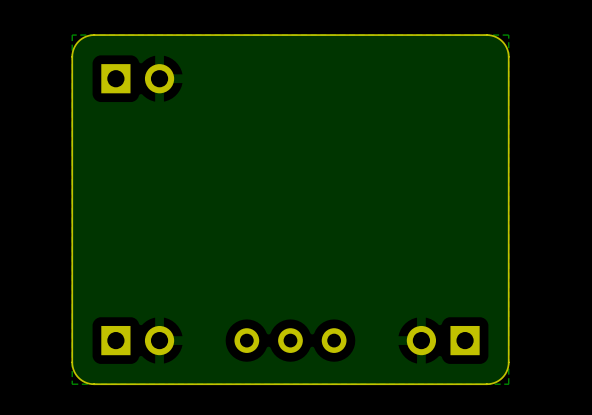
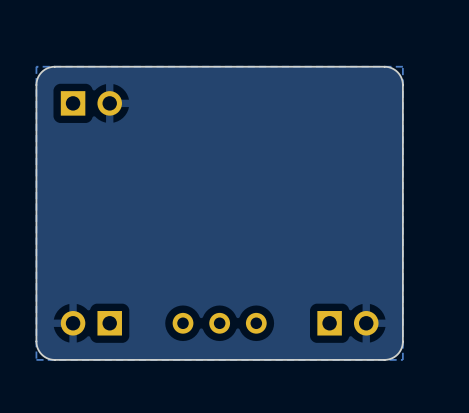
part rotation: 0° (137, 340) -> 180° (91, 323)
part rotation: 0° (443, 340) -> 180° (347, 323)

